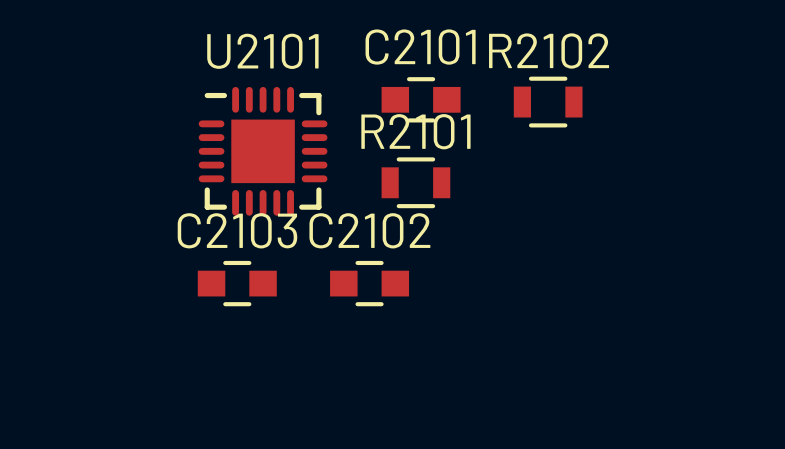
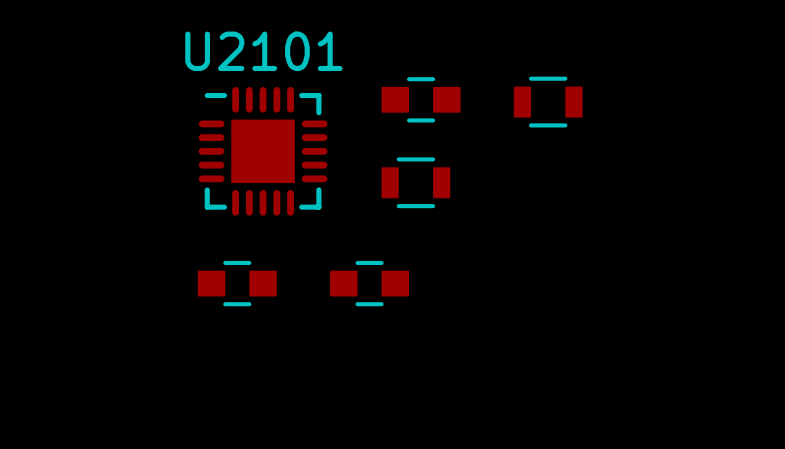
C2101 name: C2101 (420, 47) -> none
R2102 name: R2102 (549, 50) -> none
R2101 name: R2101 (415, 131) -> none
C2103 name: C2103 (237, 230) -> none
C2102 name: C2102 (369, 230) -> none

